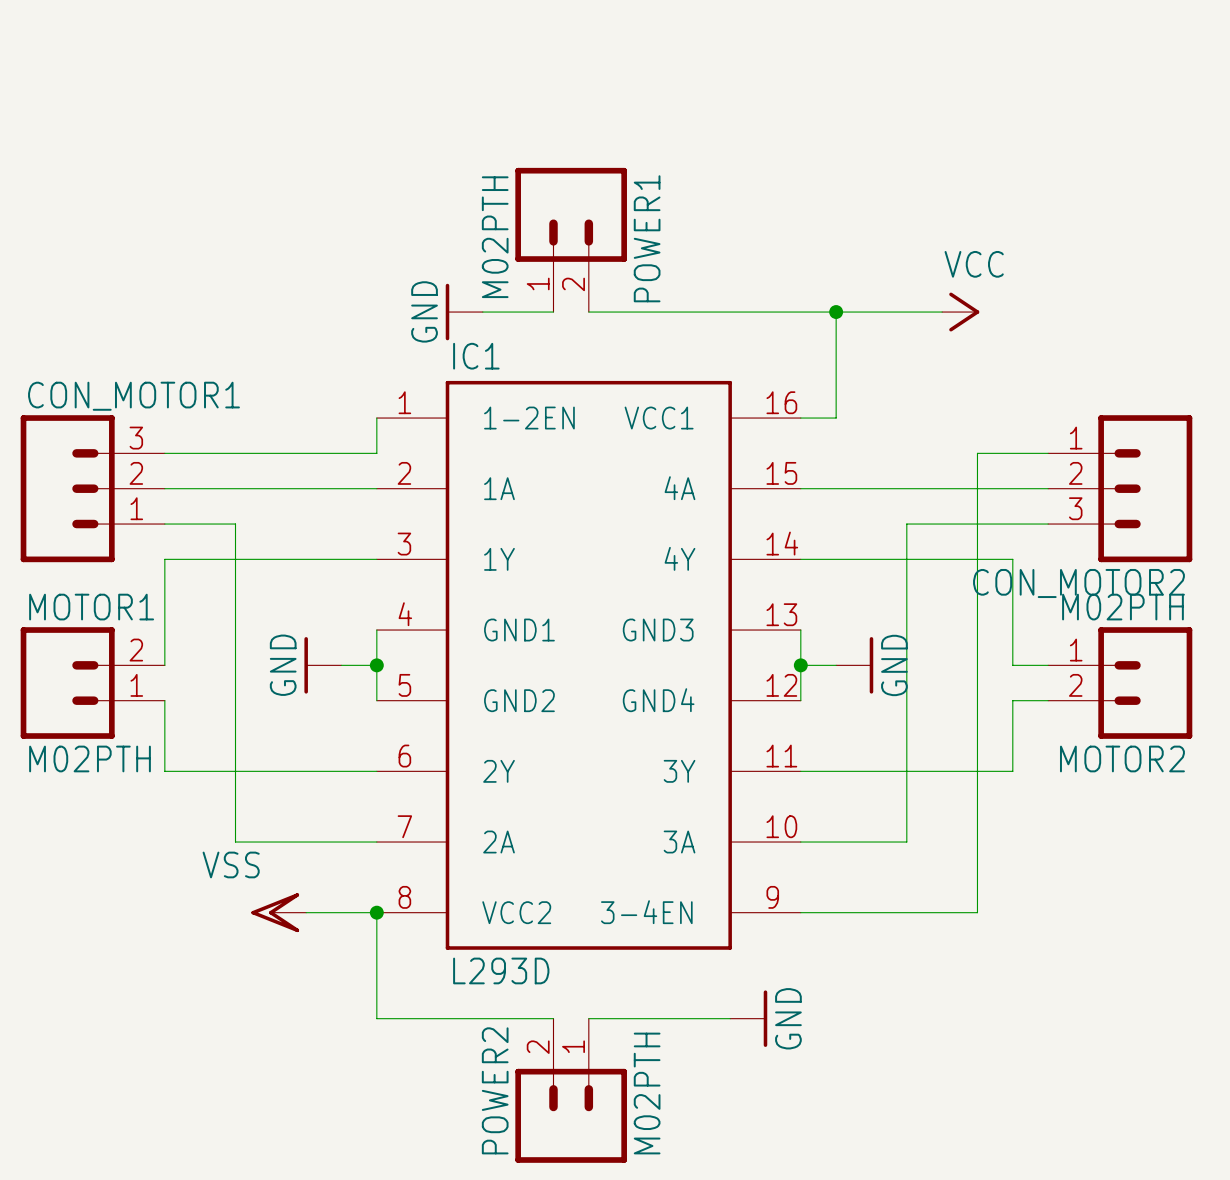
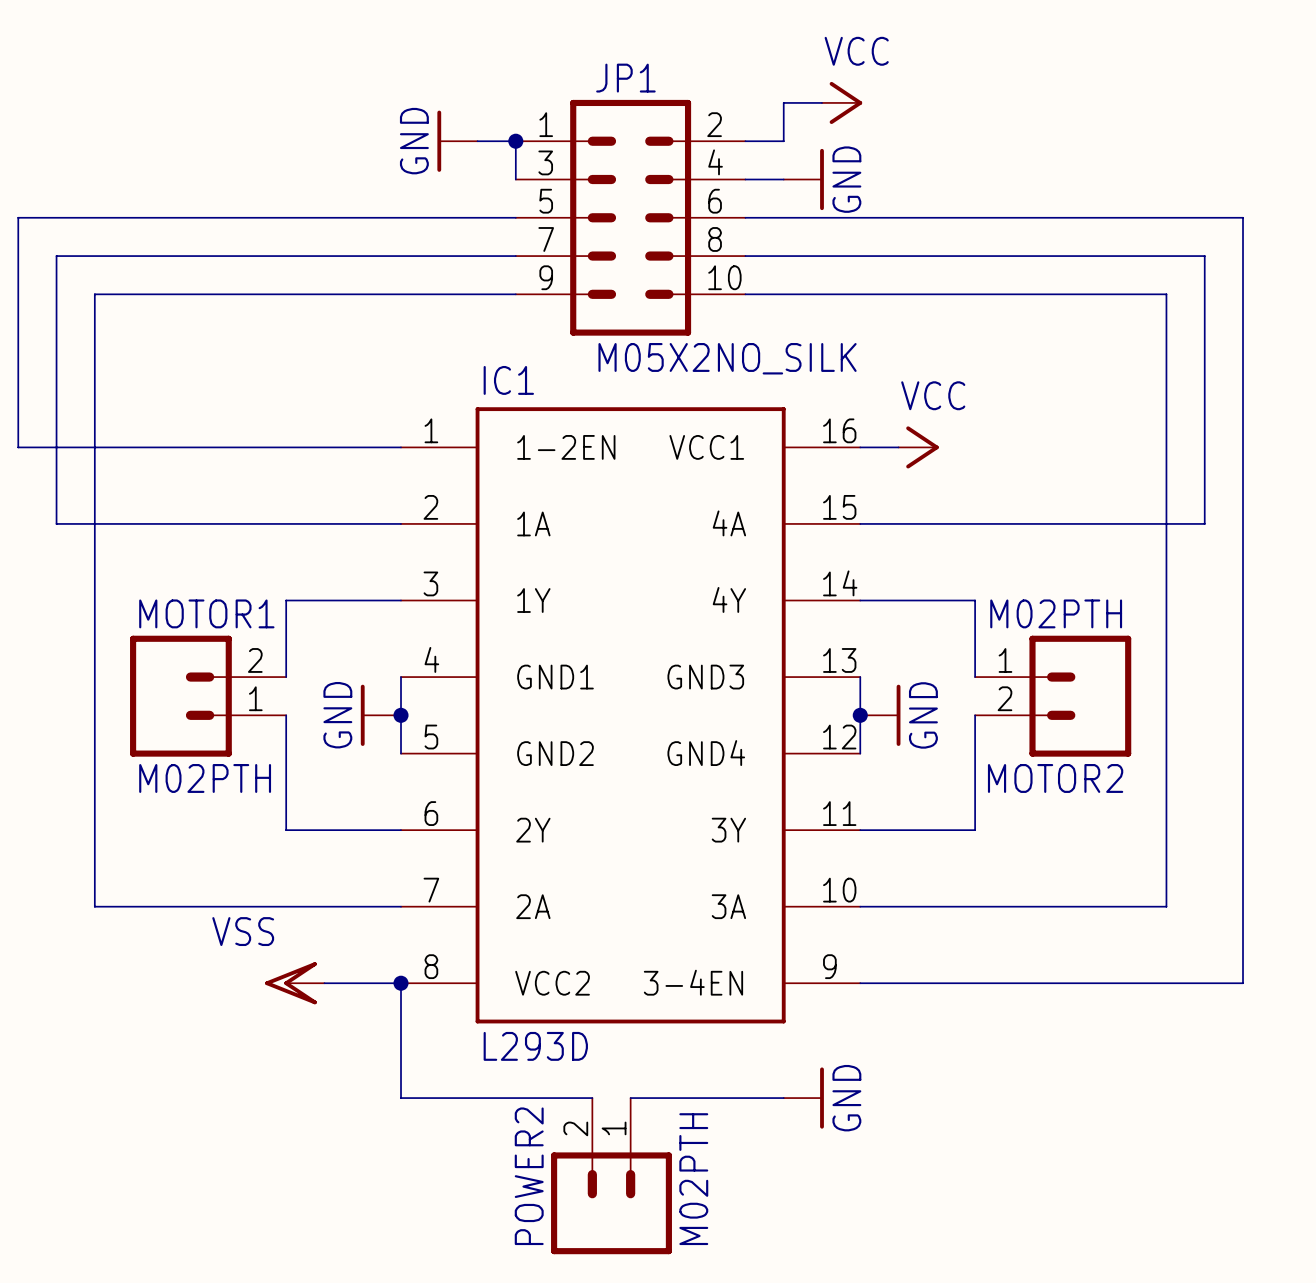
wire: none -> (822, 102) (783, 102) (783, 141) (745, 141)
power symbol: none -> VCC (842, 102)
power symbol: none -> GND (457, 141)
wire: none -> (477, 141) (515, 141) (515, 179)
junction: none -> (515, 141)
wire: none -> (745, 179) (783, 179)
power symbol: none -> GND (803, 179)
JP1: none -> M05X2NO_SILK (630, 217)
POWER1: M02PTH (571, 239) -> none
wire: none -> (515, 256) (56, 256) (56, 523) (171, 523)
wire: none -> (745, 256) (1204, 256) (1204, 523) (1128, 523)
power symbol: GND (464, 312) -> none
wire: (482, 312) (553, 312) -> none
wire: (588, 312) (942, 312) -> none
wire: (836, 312) (836, 418) -> none
junction: (836, 312) -> none
power symbol: VCC (960, 312) -> none
wire: (376, 418) (376, 453) (164, 453) -> (401, 447) (18, 447) (18, 217) (515, 217)
power symbol: none -> VCC (918, 447)
wire: (1048, 453) (977, 453) (977, 912) -> (745, 217) (1243, 217) (1243, 983) (1051, 983)
CON_MOTOR1: (92, 488) -> none
CON_MOTOR2: (1120, 488) -> none
wire: (164, 524) (235, 524) (235, 842) -> (515, 294) (94, 294) (94, 906) (247, 906)
wire: (1048, 524) (906, 524) (906, 559) (1012, 559) (1012, 665) (1048, 665) -> none
wire: (270, 559) (164, 559) (164, 665) -> (286, 600) (286, 677)
wire: (906, 630) (906, 665) -> none
power symbol position: GND (322, 665) -> GND (380, 715)
power symbol position: GND (854, 665) -> GND (880, 715)
MOTOR1 position: (92, 683) -> (208, 696)
MOTOR2 position: (1120, 683) -> (1053, 696)
wire: (164, 700) (164, 771) (270, 771) -> (286, 715) (286, 830)
wire: (1048, 700) (1012, 700) (1012, 771) (906, 771) (906, 842) -> (745, 294) (1166, 294) (1166, 906) (975, 906)

